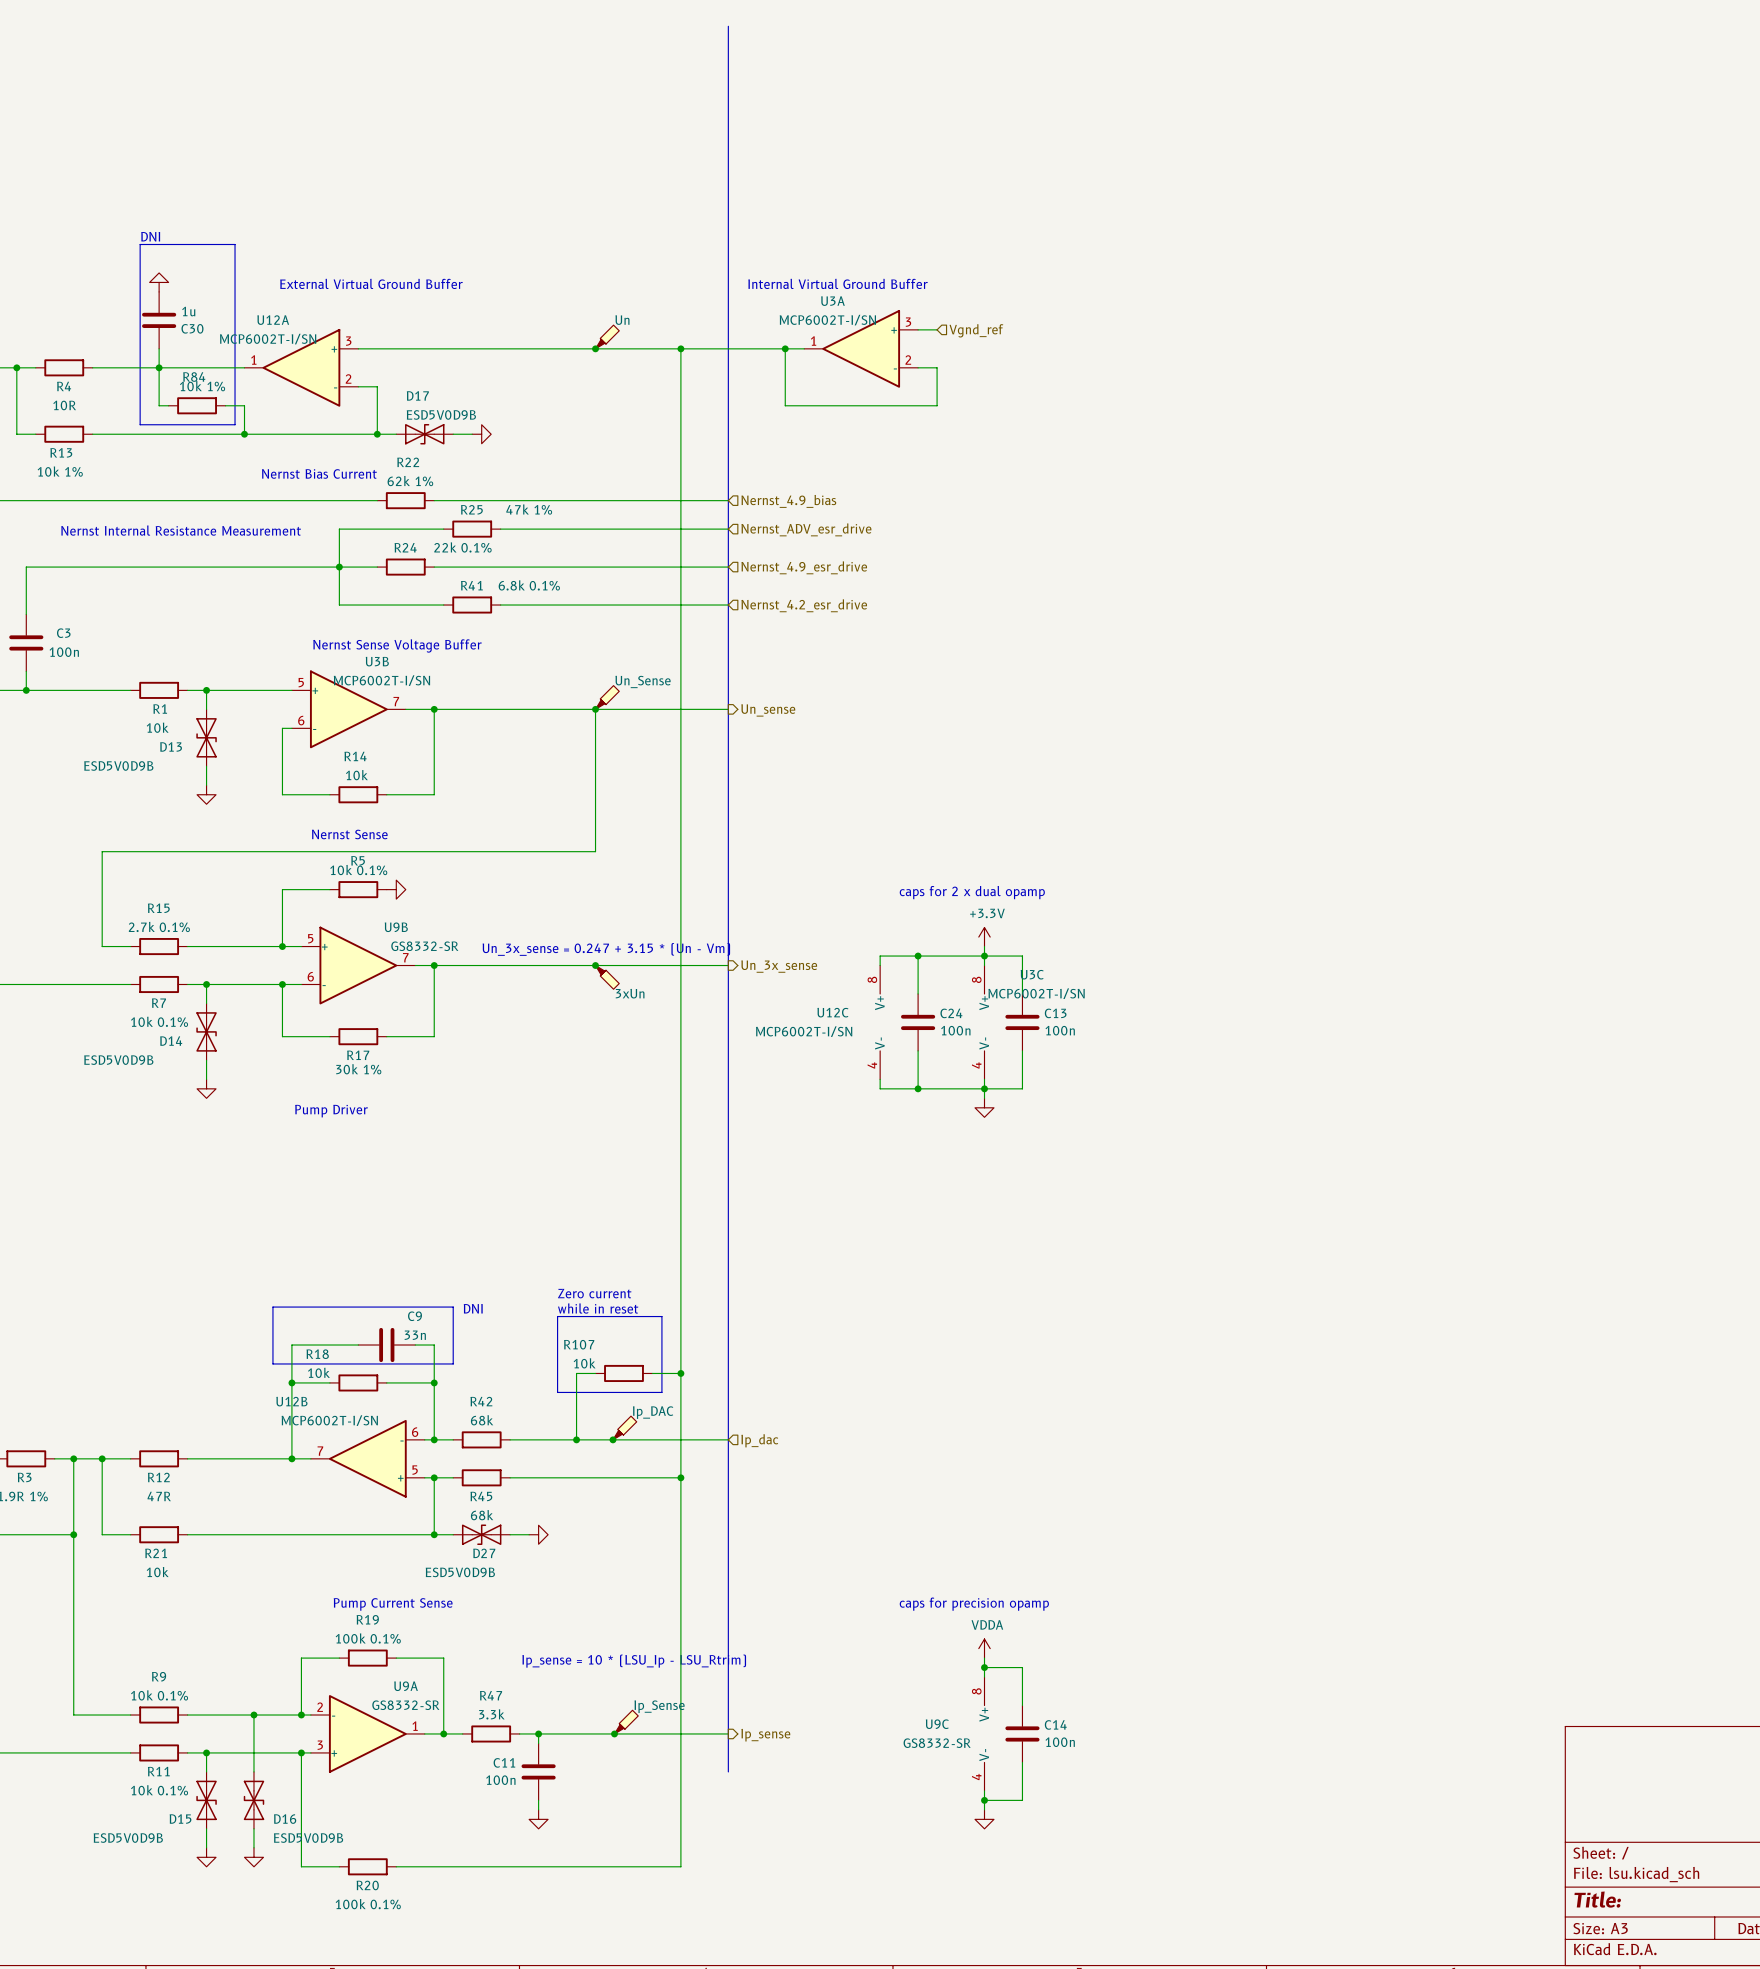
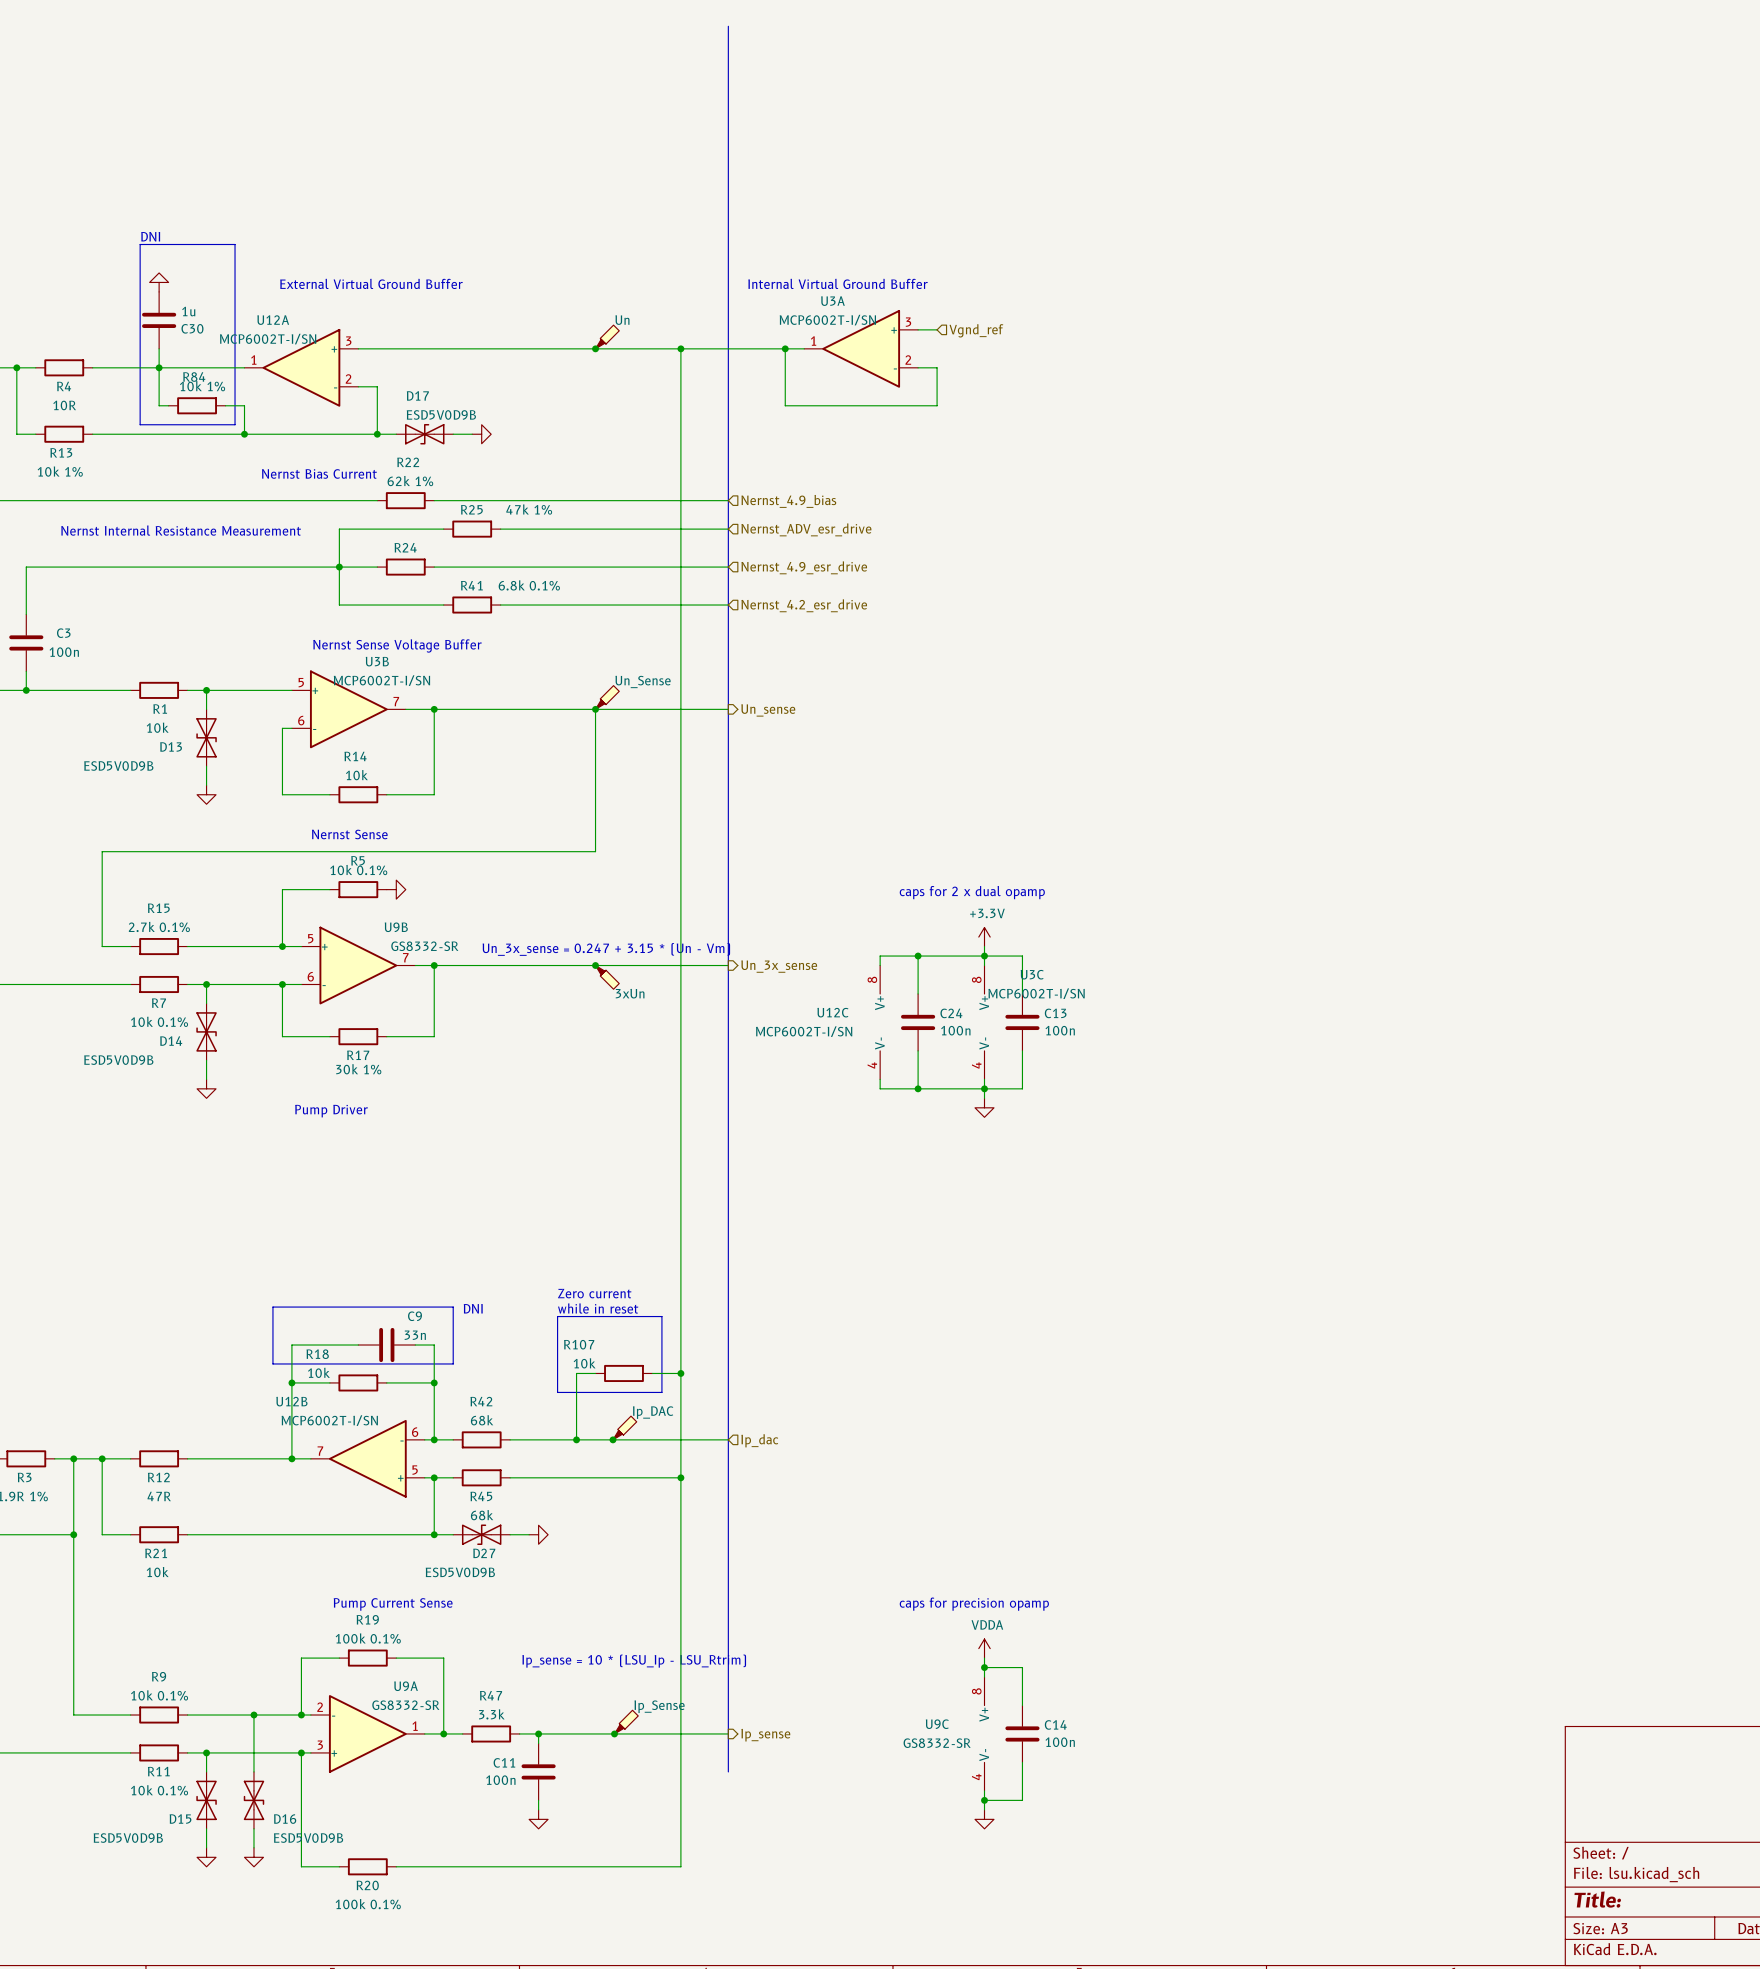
R24 value: 22k 0.1% (462, 547) -> none

